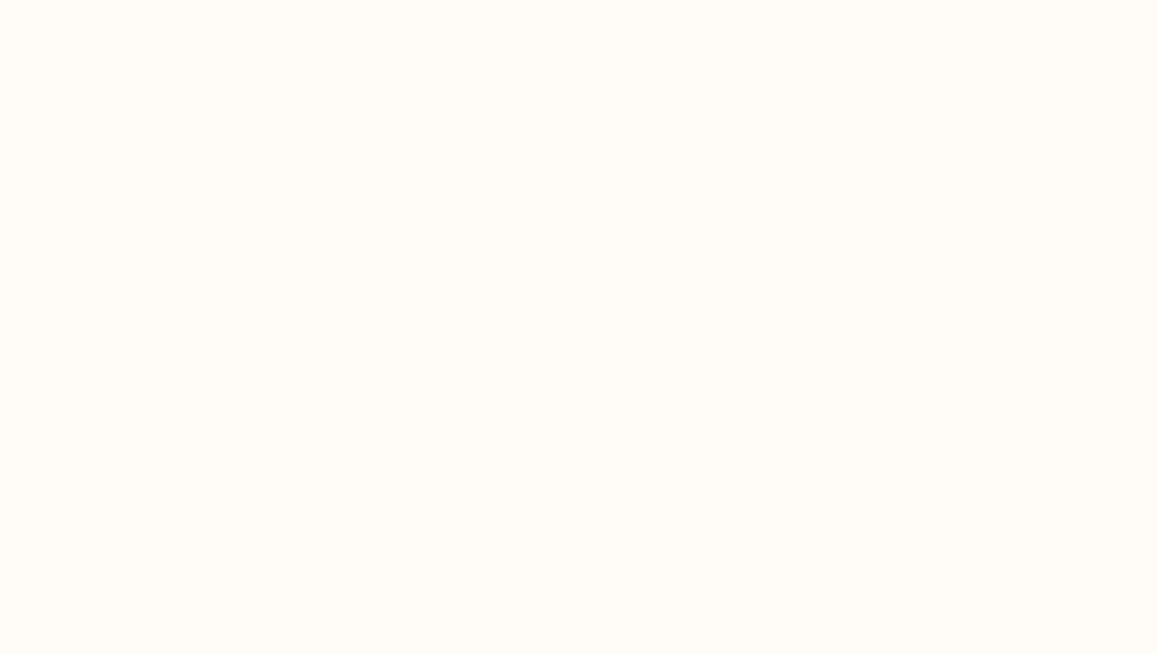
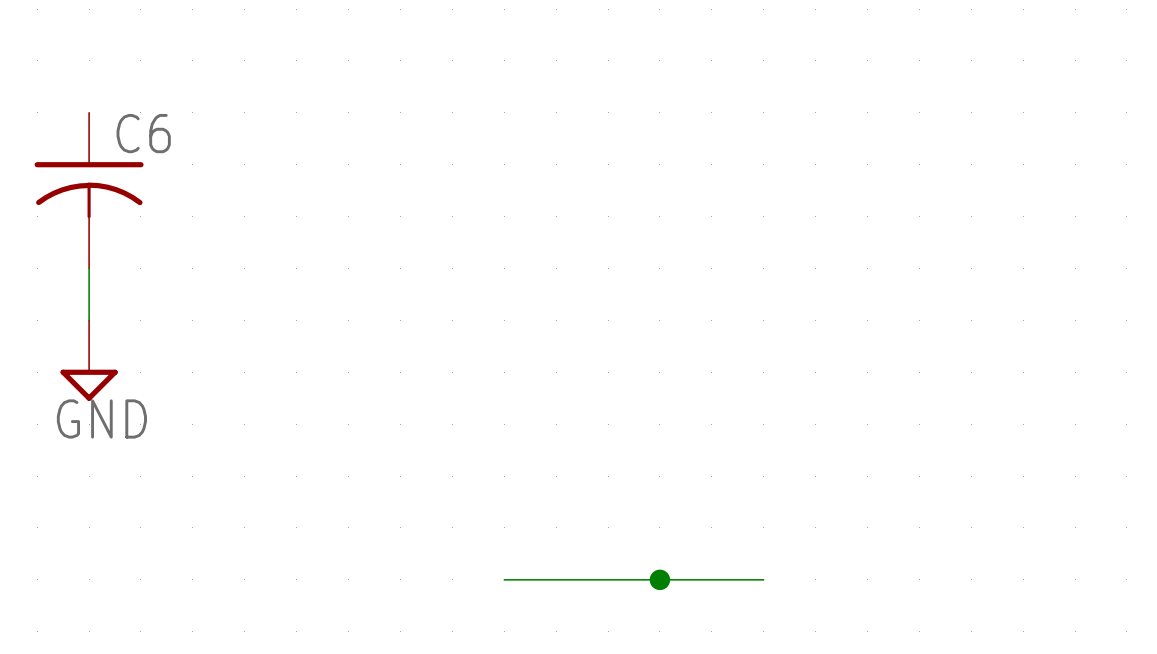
C6: none -> (89, 190)
wire: none -> (89, 268) (89, 320)
power symbol: none -> GND (89, 360)
wire: none -> (504, 579) (763, 579)
junction: none -> (659, 579)

